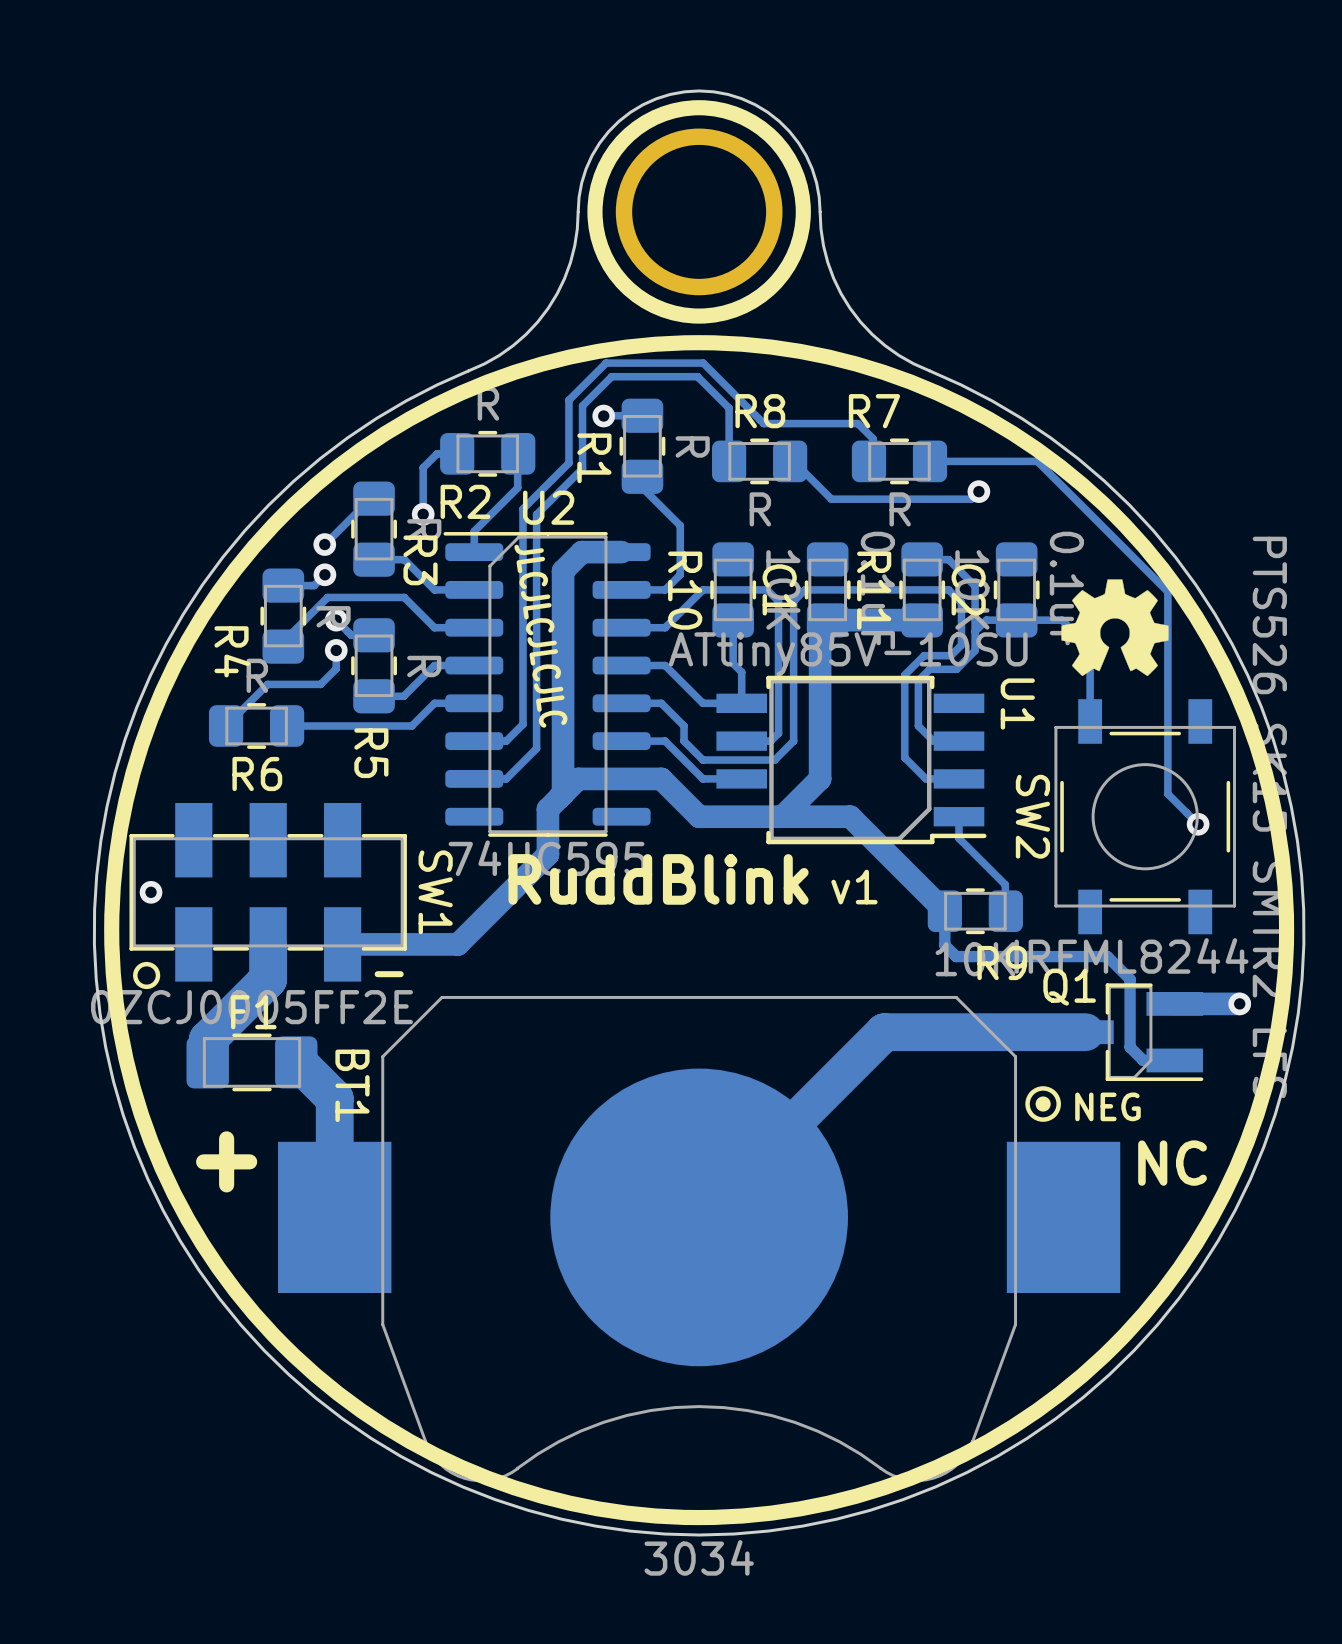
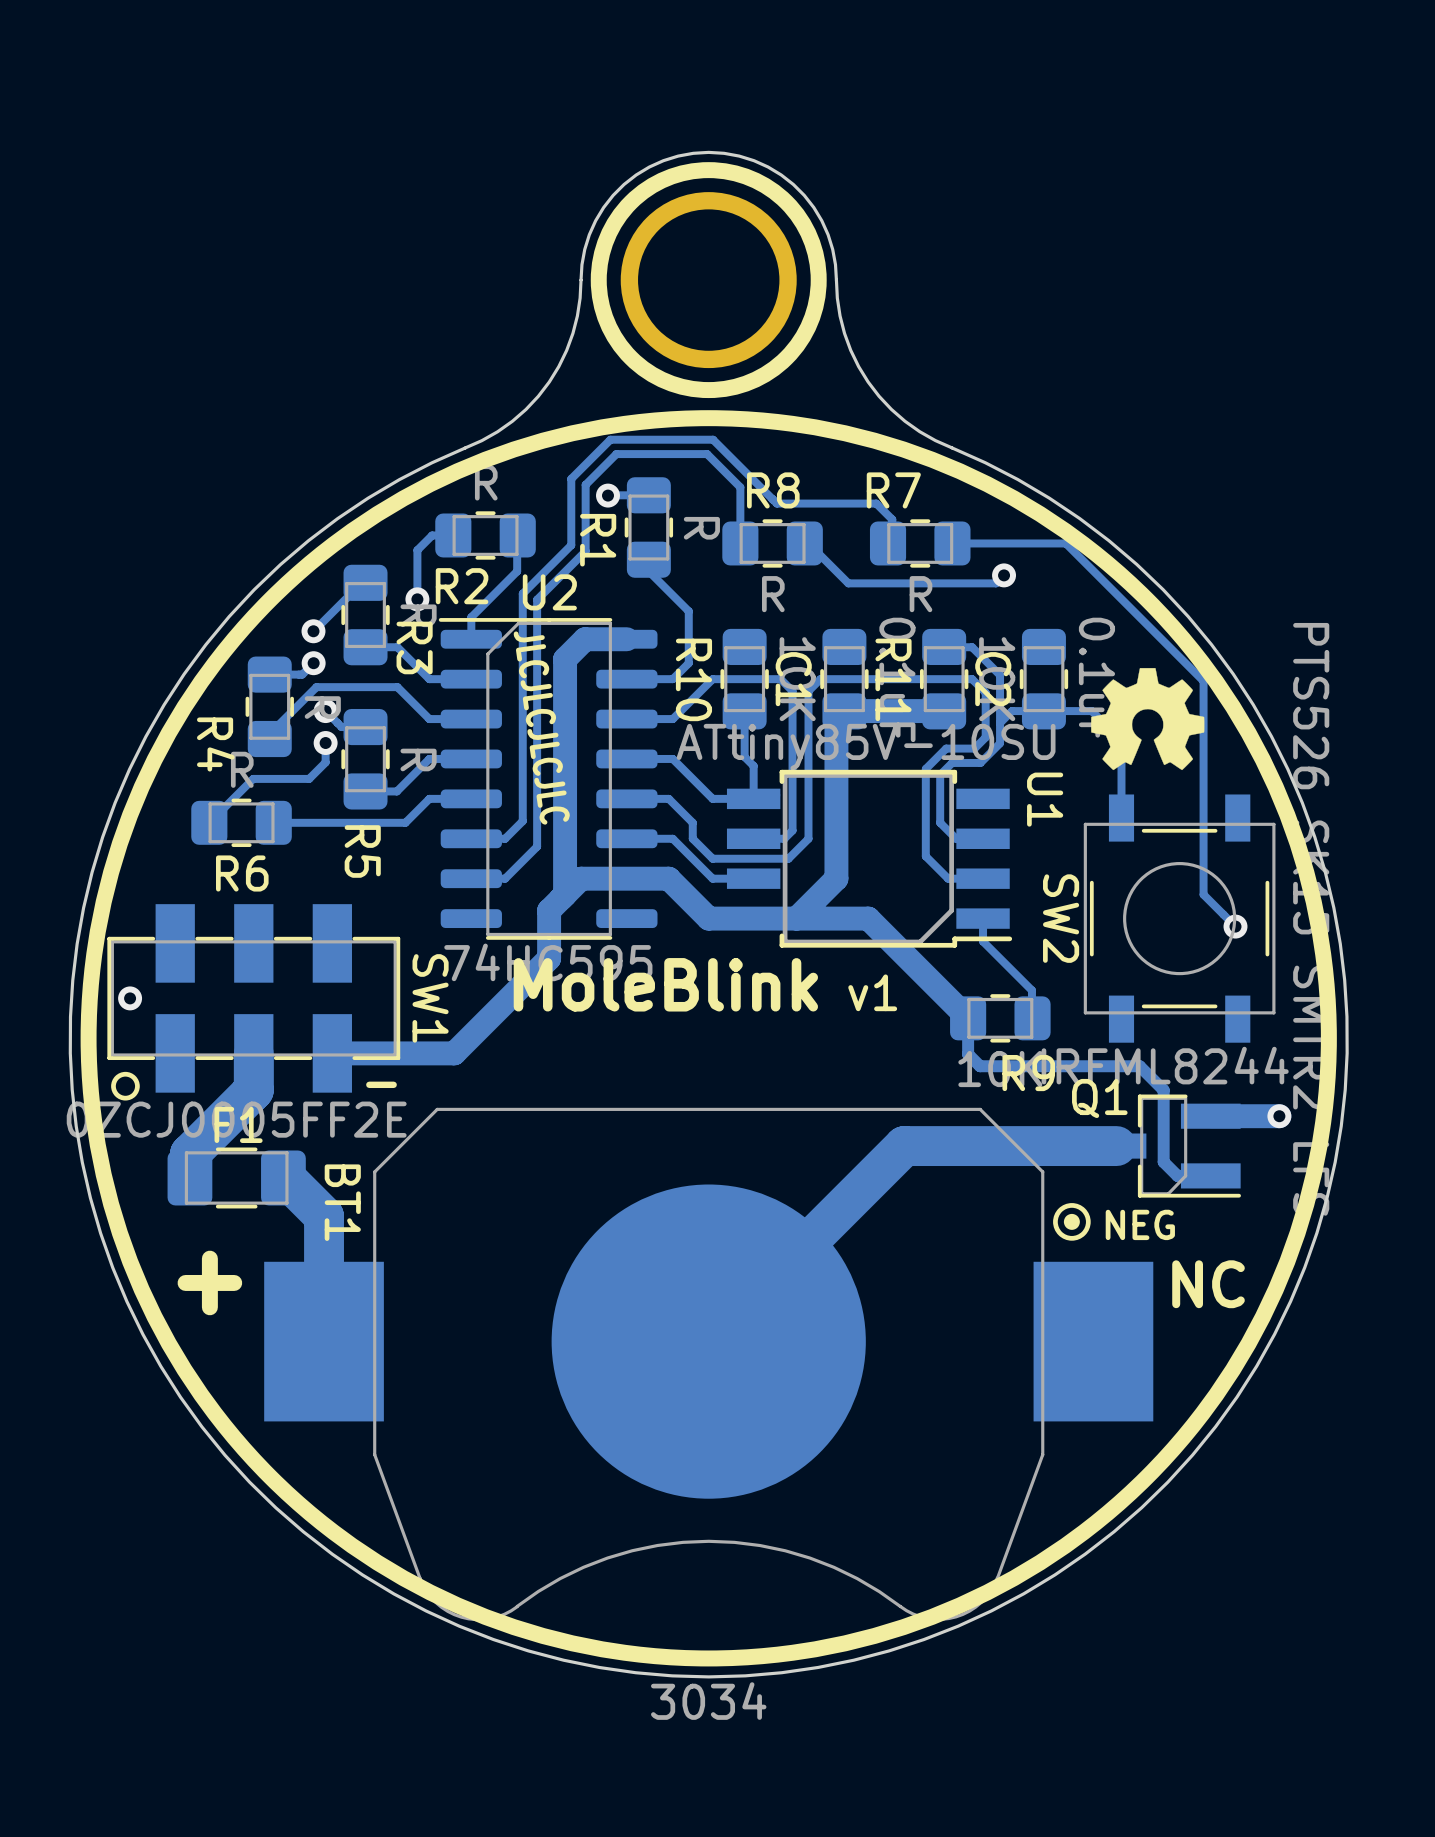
text: RuddBlink (658, 879) -> MoleBlink (665, 984)

